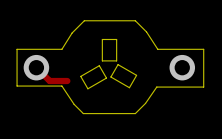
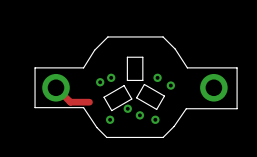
via: none -> (111, 77)
via: none -> (157, 77)
via: none -> (100, 82)
via: none -> (170, 85)
via: none -> (127, 108)
via: none -> (139, 115)
via: none -> (110, 119)
via: none -> (155, 119)

